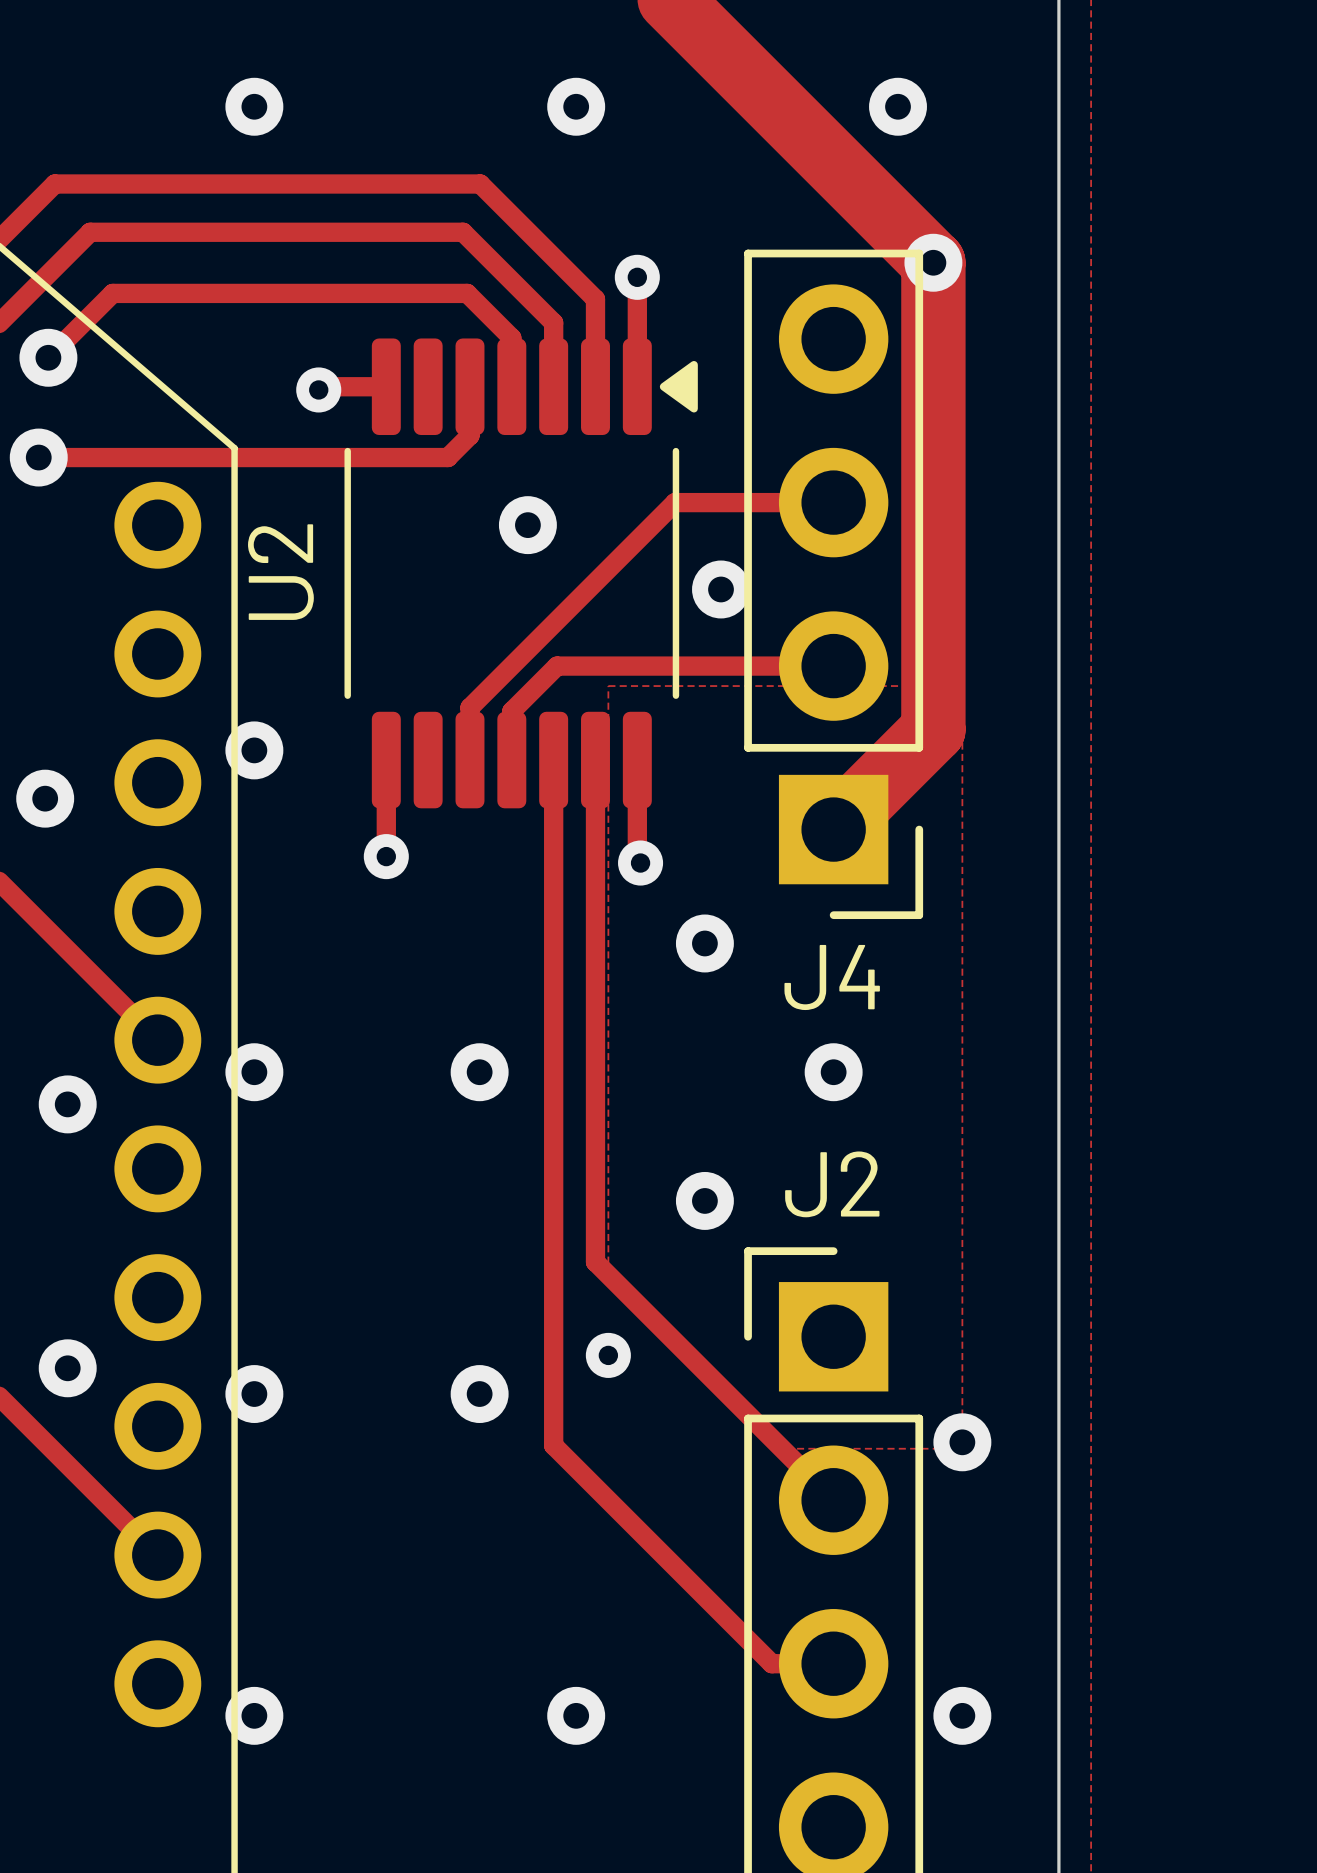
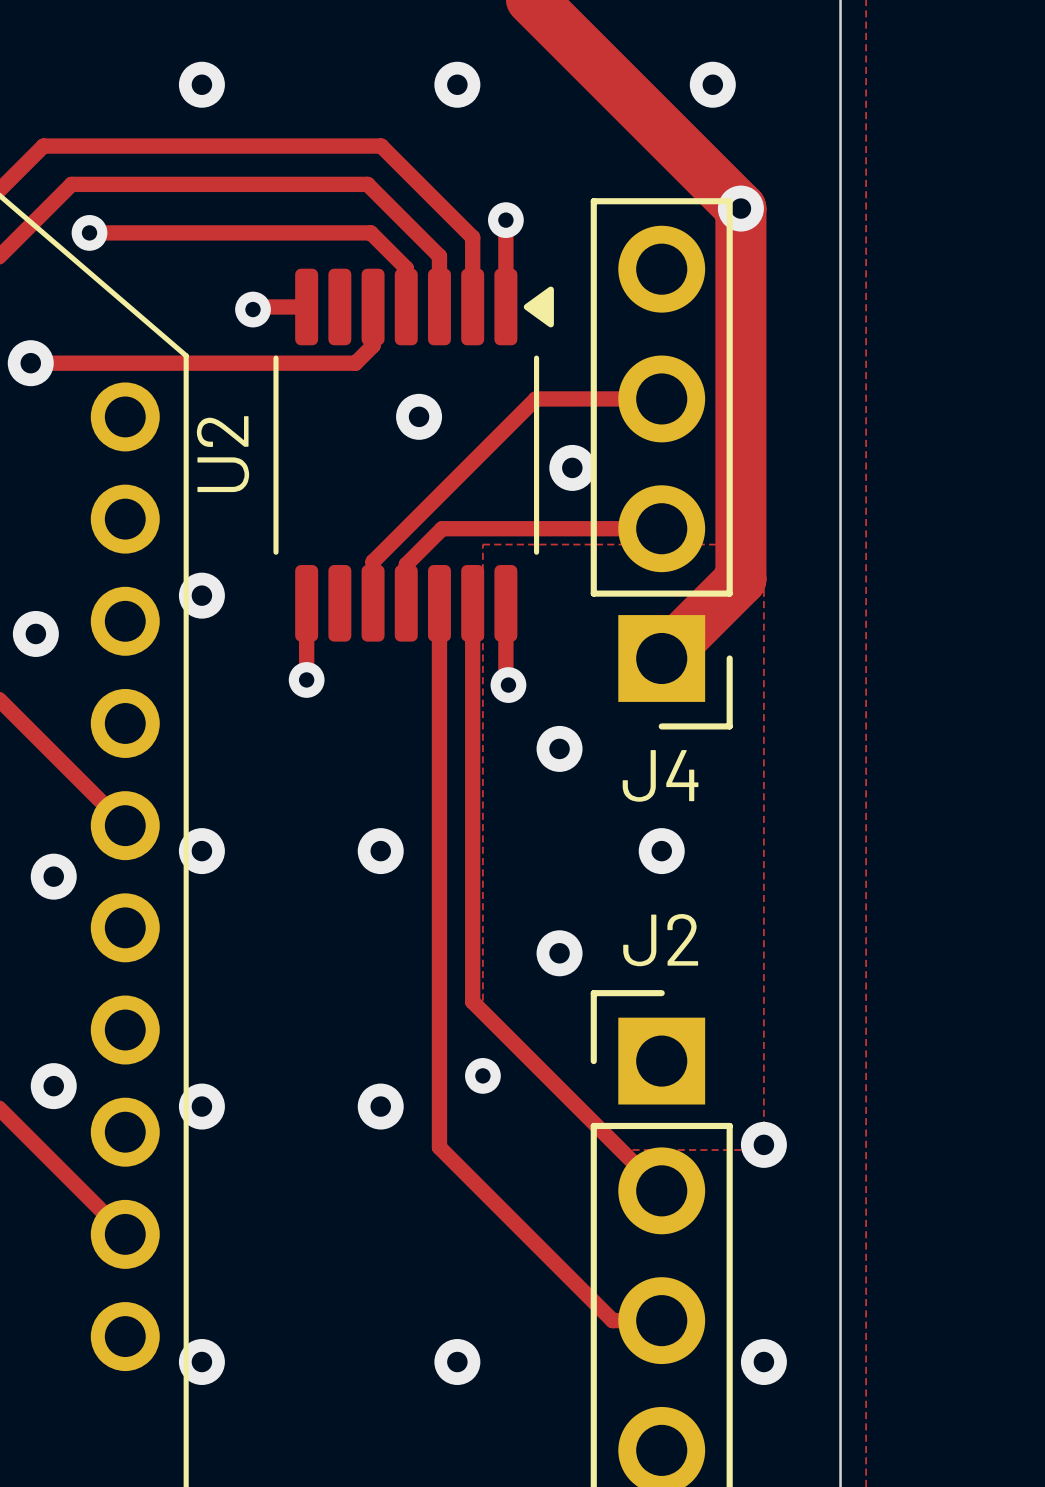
track: (112, 293) (48, 357) -> none
via: none -> (89, 232)
via: (48, 357) -> none

